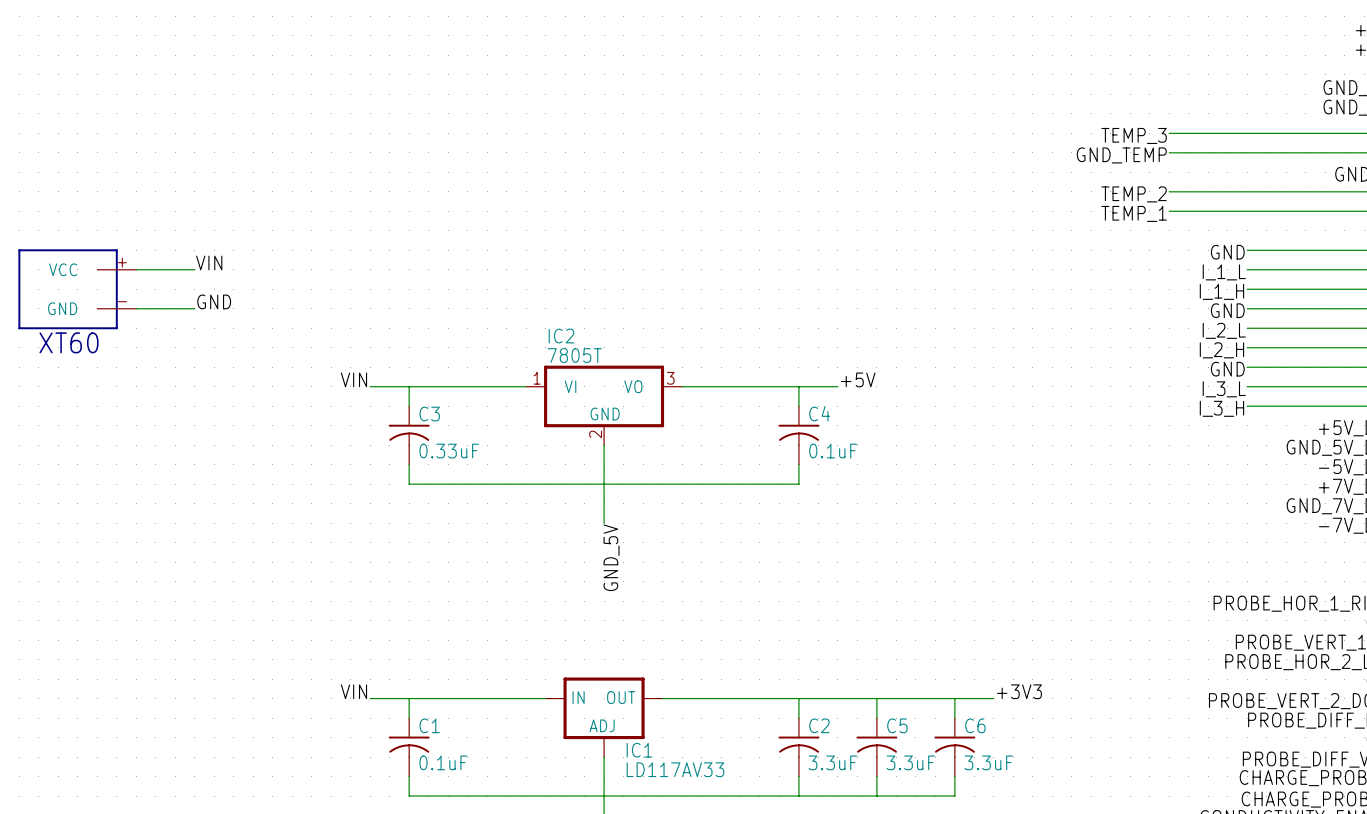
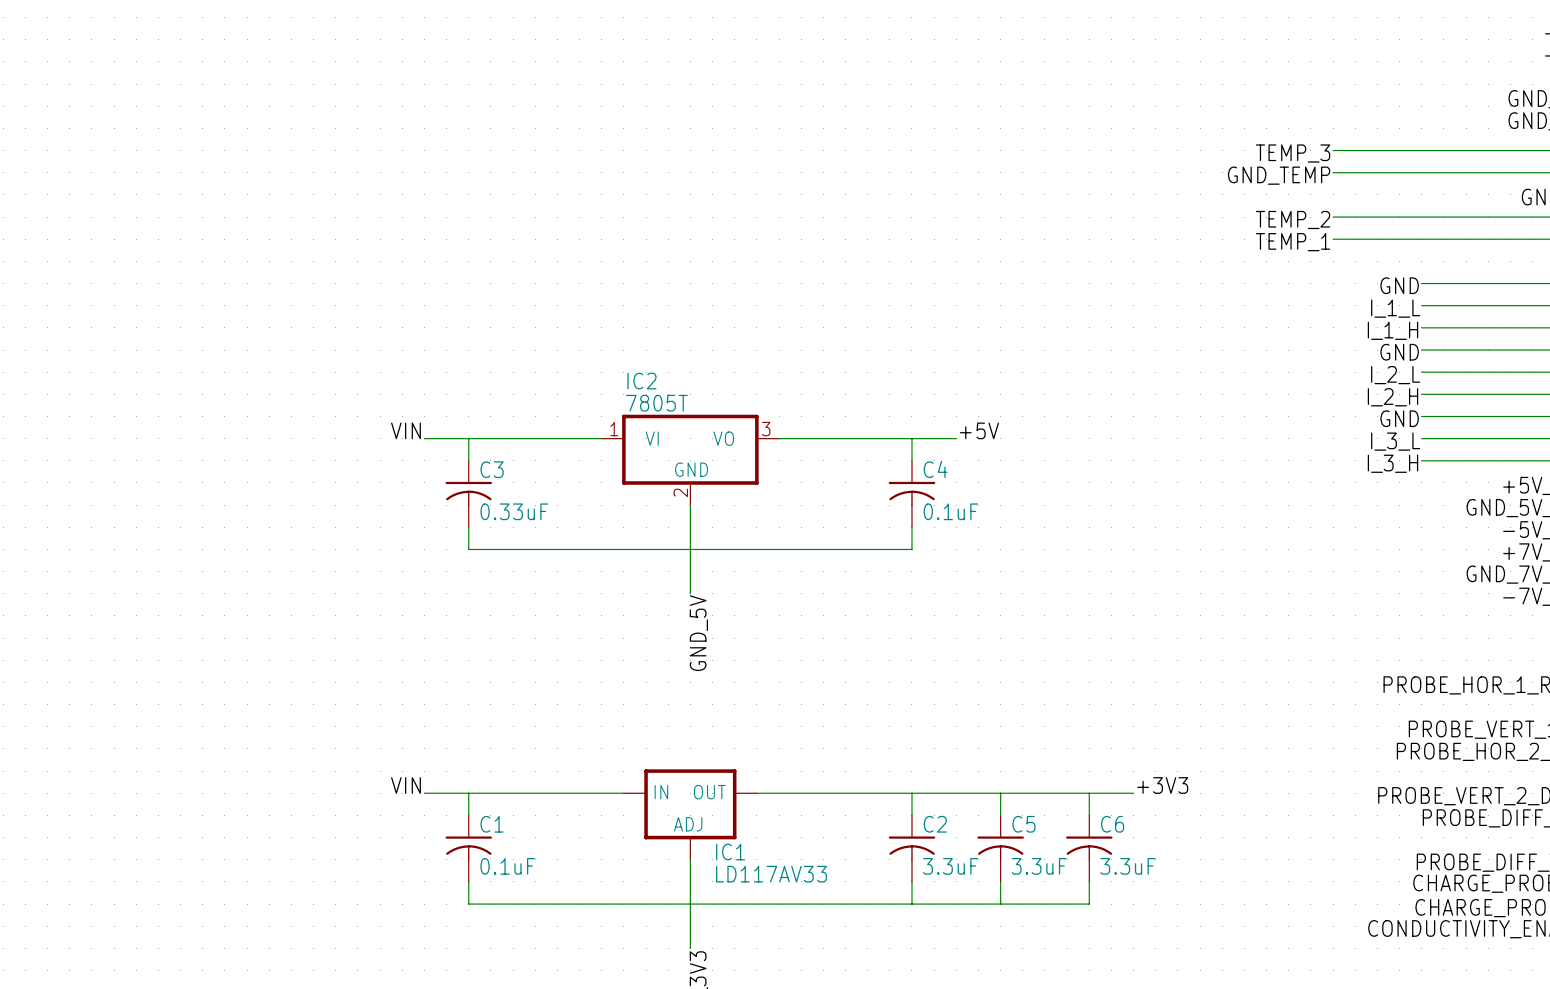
label: VIN (209, 262) -> none
wire: (136, 269) (194, 269) -> none
part: (77, 289) -> none
label: GND (214, 301) -> none
wire: (136, 308) (194, 308) -> none

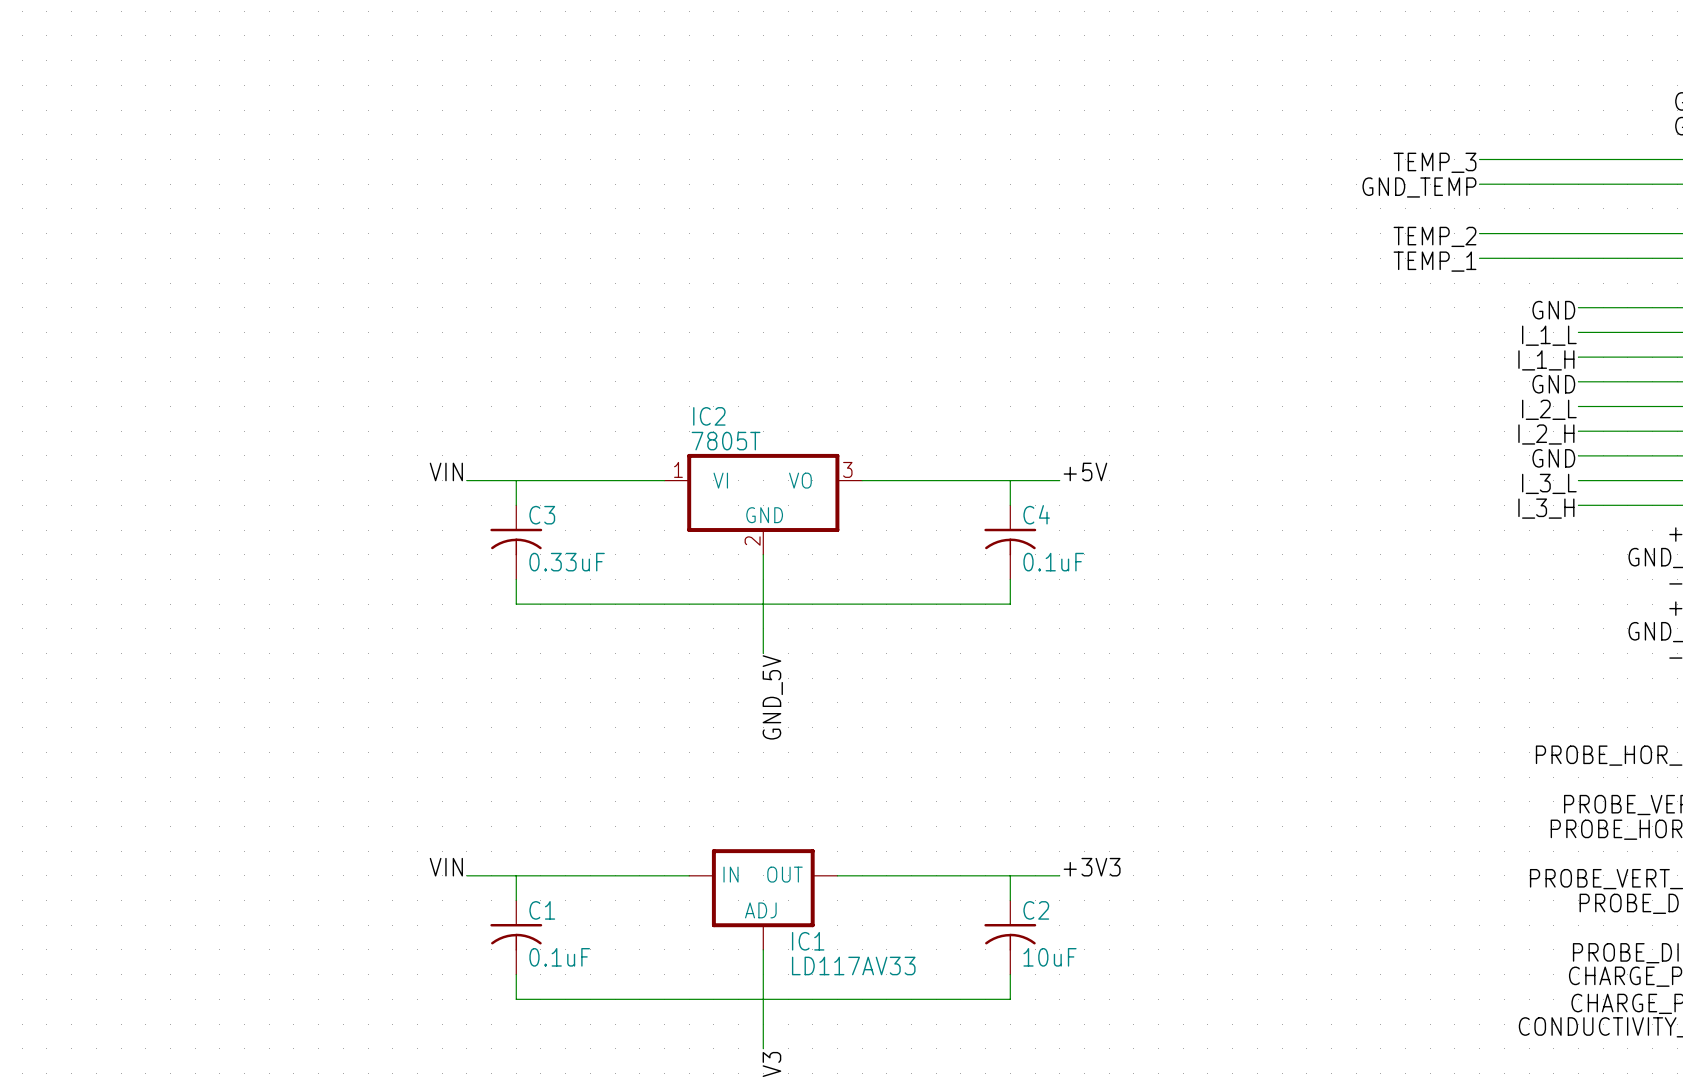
label position: +3V3 (1162, 785) -> +3V3 (1092, 867)
wire: (956, 793) (1133, 793) -> none
wire: (1000, 793) (1000, 815) -> none
wire: (1089, 793) (1089, 815) -> none
C5: 3.3uF (1000, 848) -> none
C6: 3.3uF (1089, 848) -> none
C2 value: 3.3uF (950, 866) -> 10uF (1050, 957)
wire: (1000, 881) (1000, 904) -> none
wire: (1089, 881) (1089, 904) (911, 904) -> none

